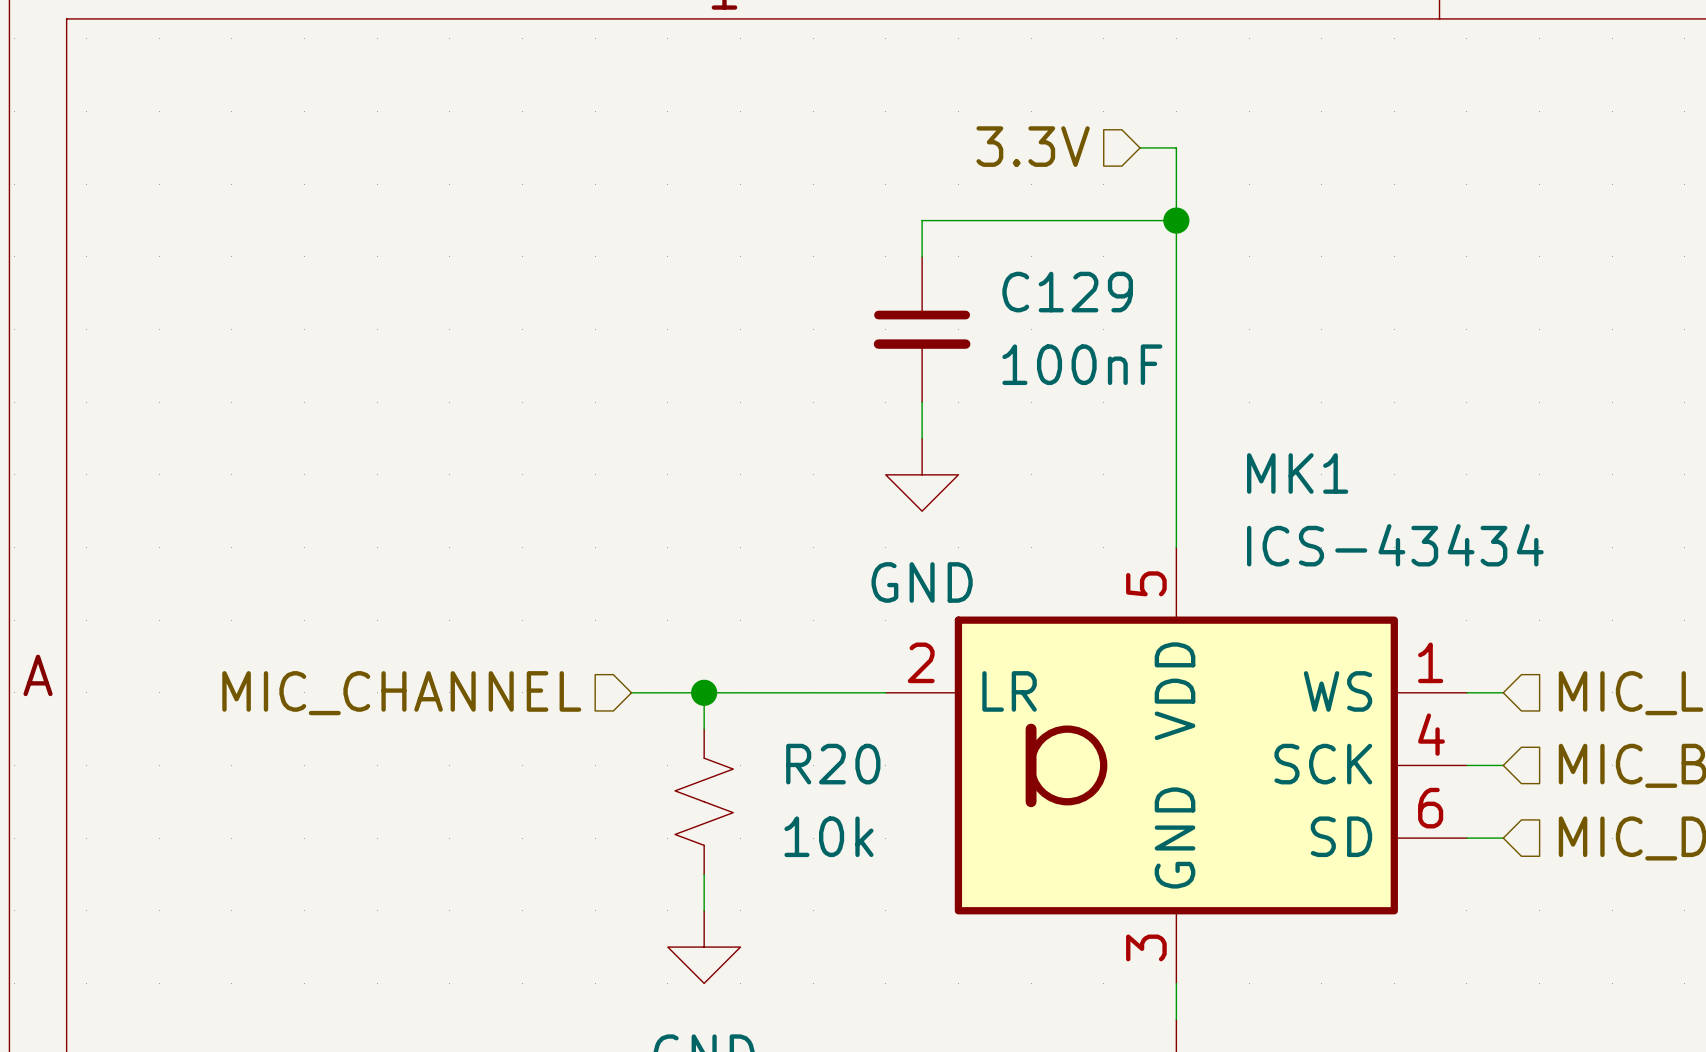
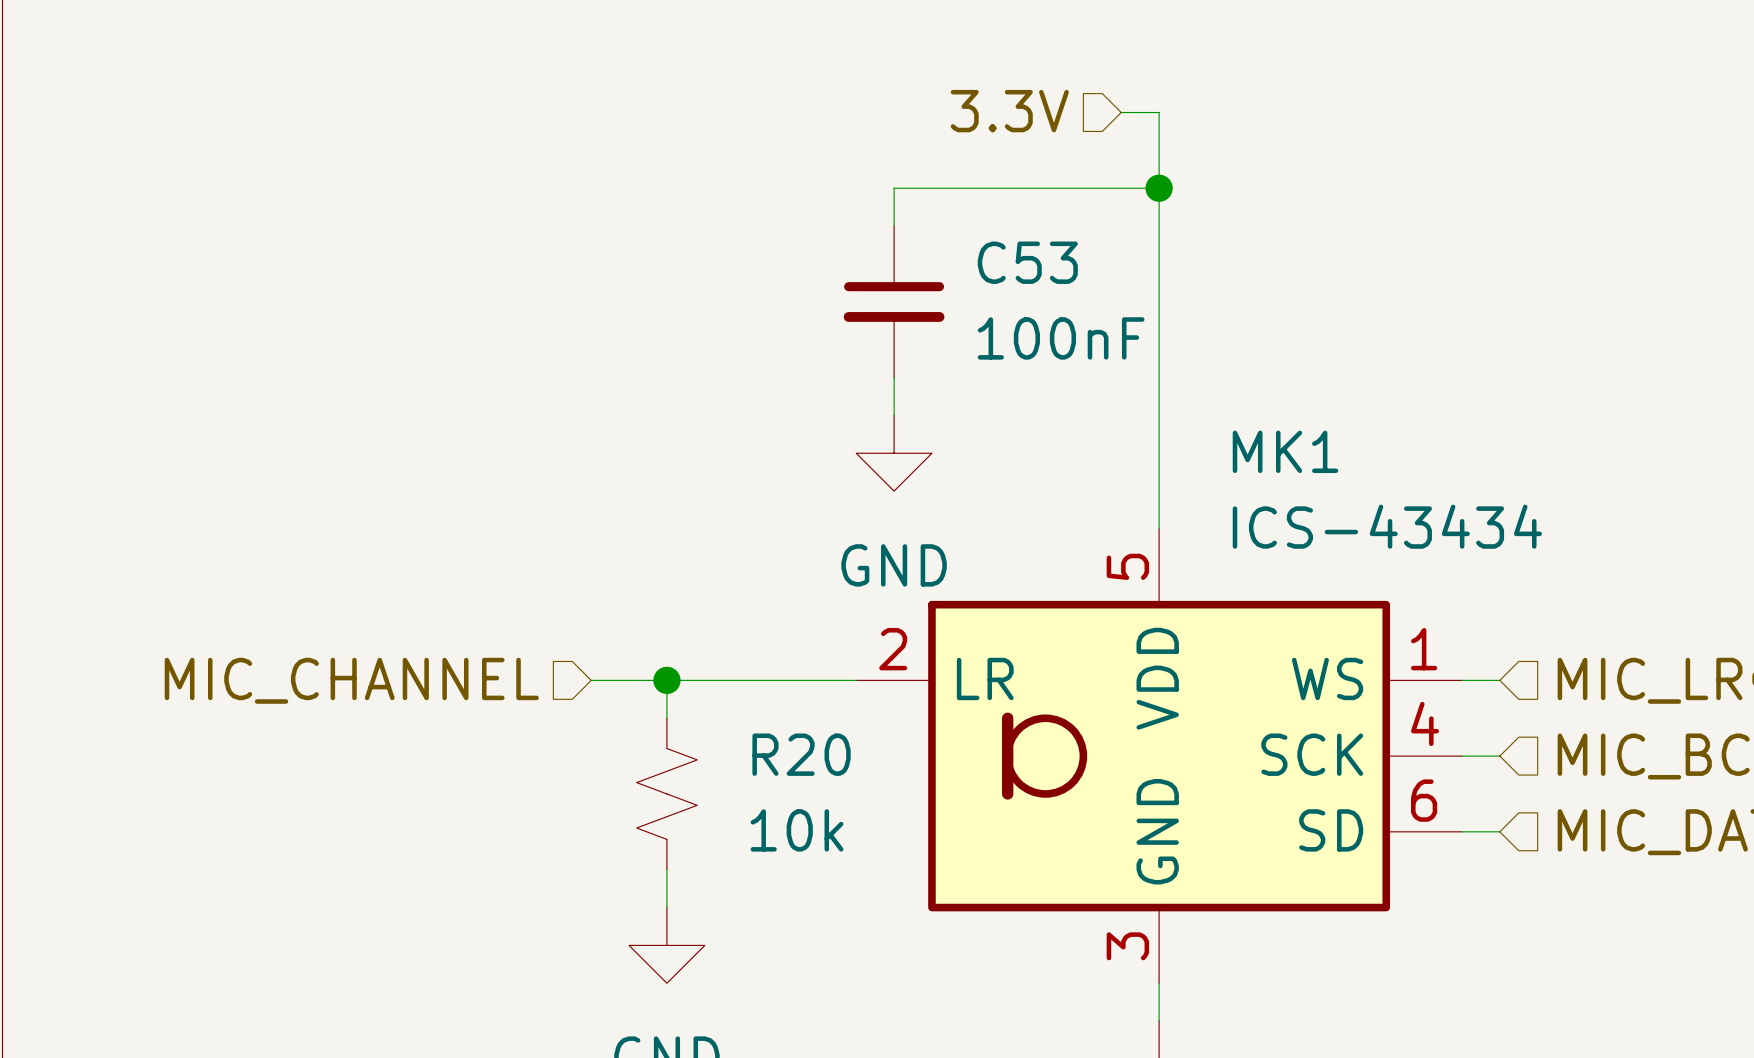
C129 name: C129 (1067, 292) -> C53 (1027, 262)

